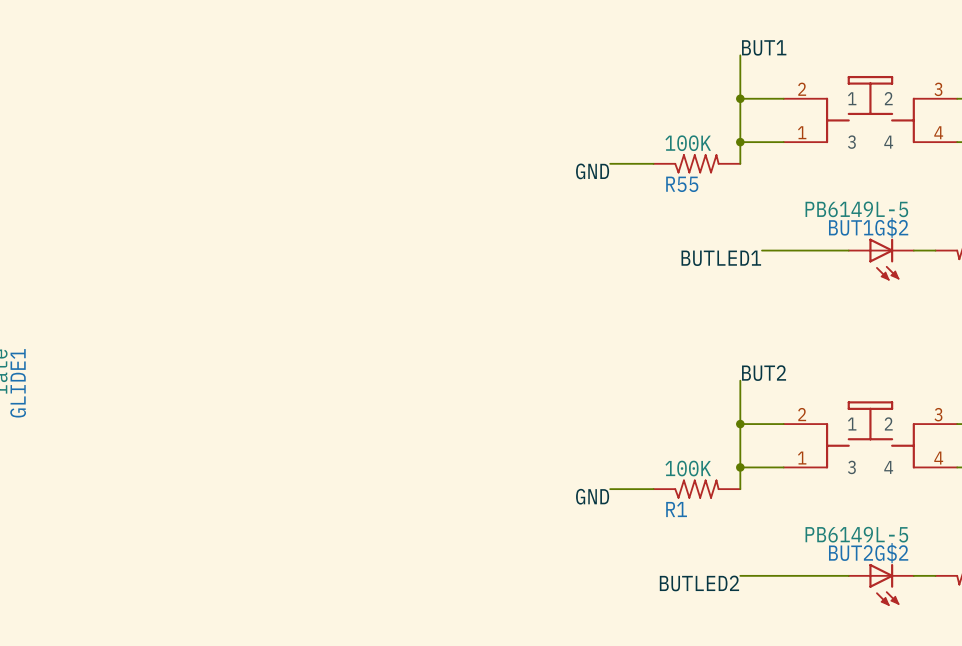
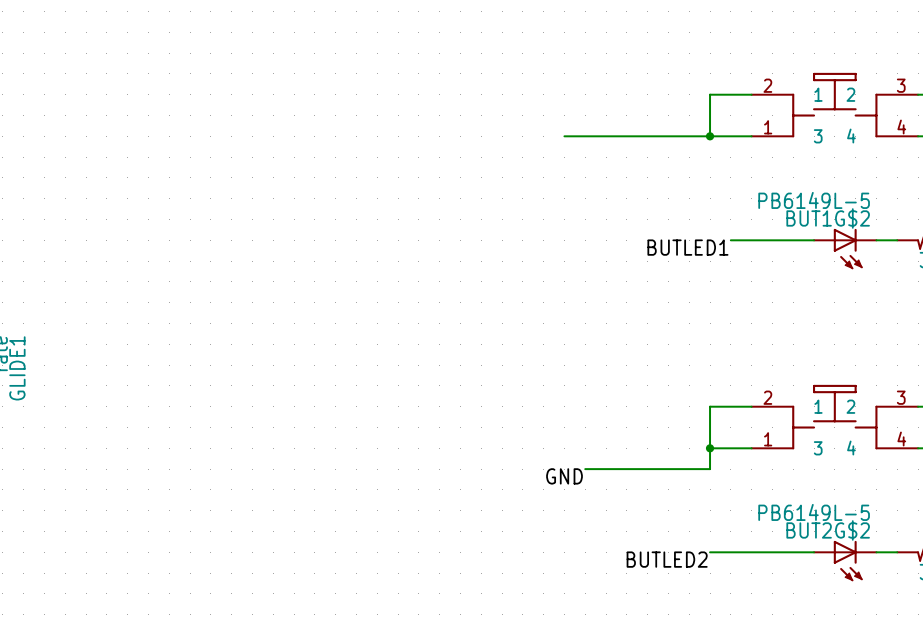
label: BUT1 (764, 47) -> none
wire: (740, 55) (740, 98) -> none
junction: (740, 98) -> none
wire: (740, 142) (740, 163) -> (710, 136) (564, 136)
wire: (610, 163) (653, 163) -> none
R55: 100K (696, 163) -> none
label: GND (592, 171) -> none
label: BUT2 (764, 373) -> none
wire: (740, 380) (740, 424) -> none
junction: (740, 424) -> none
R1: 100K (696, 489) -> none

